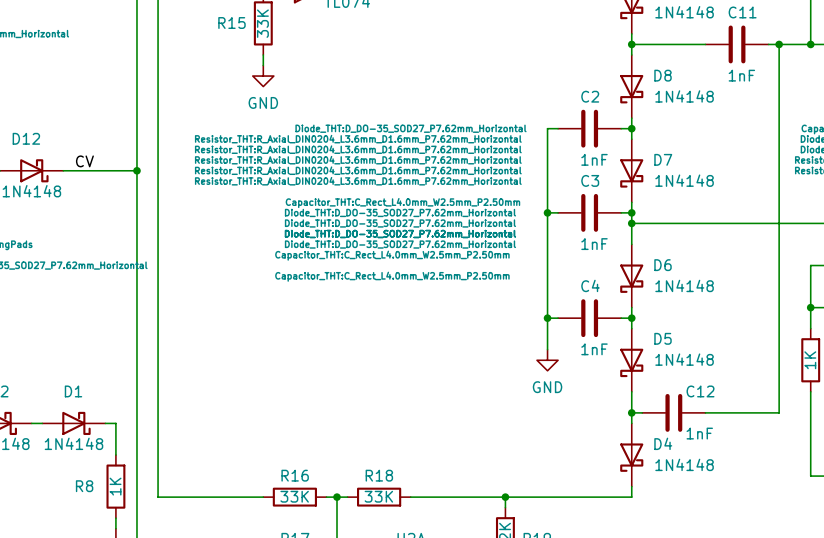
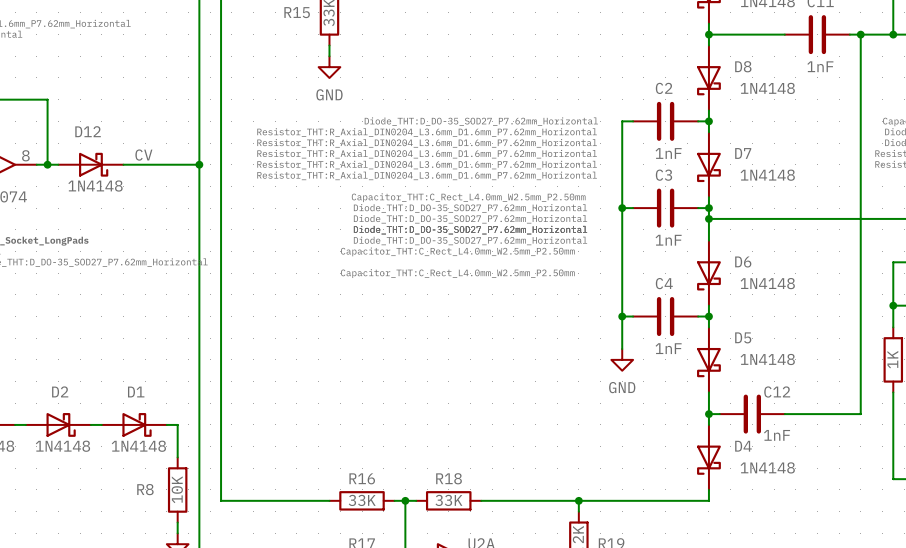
R8 value: 1K (115, 486) -> 10K (177, 489)

